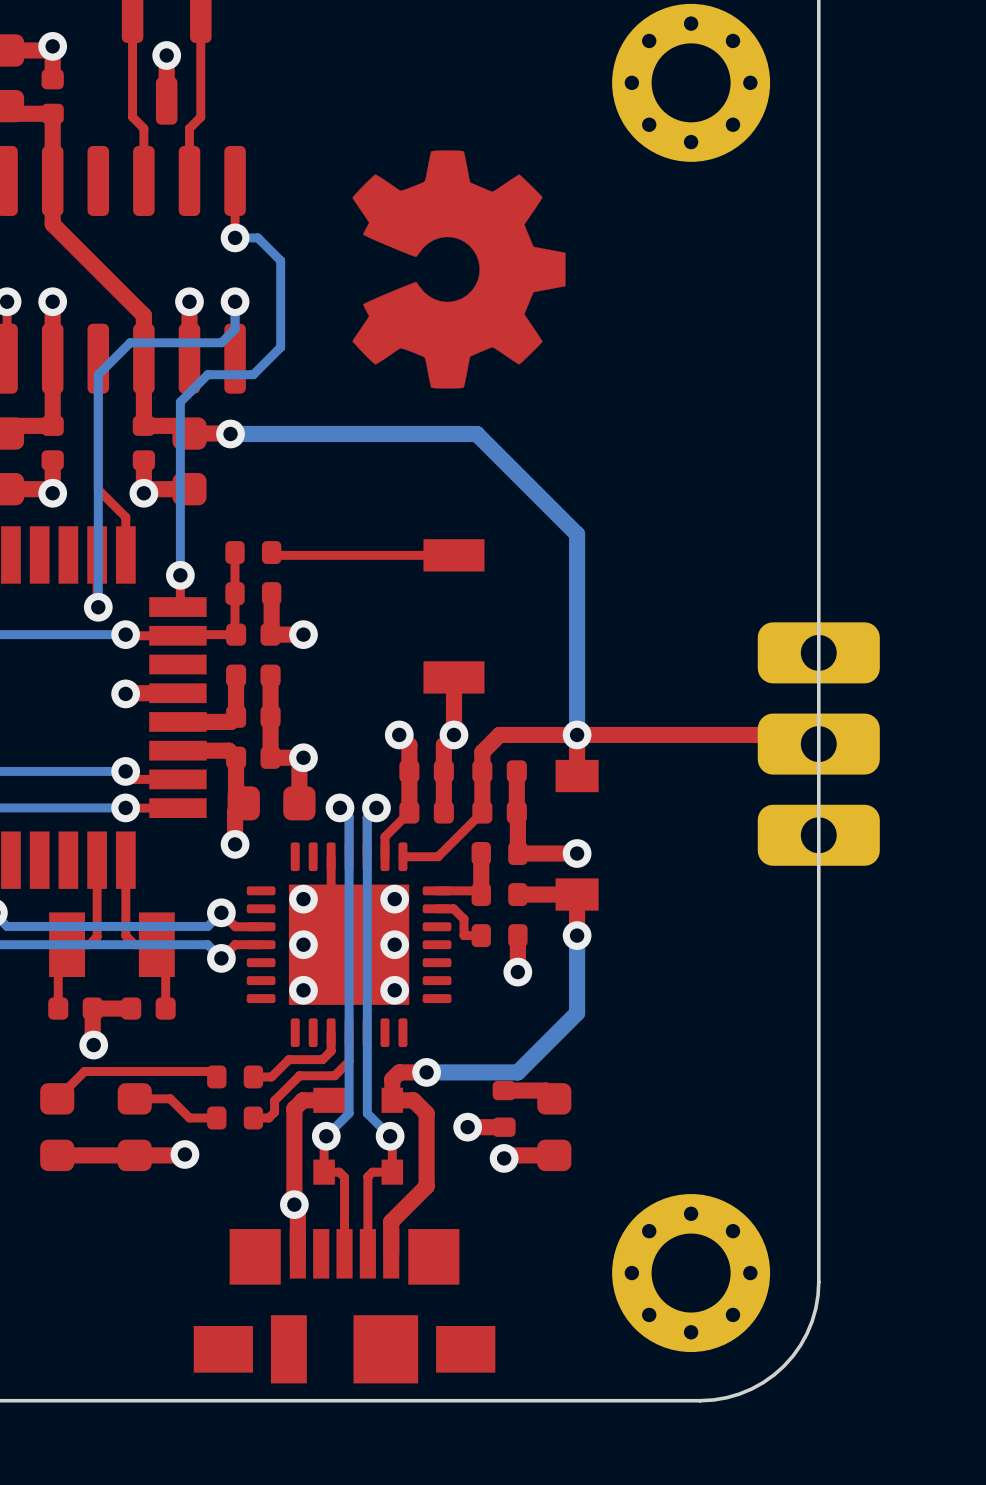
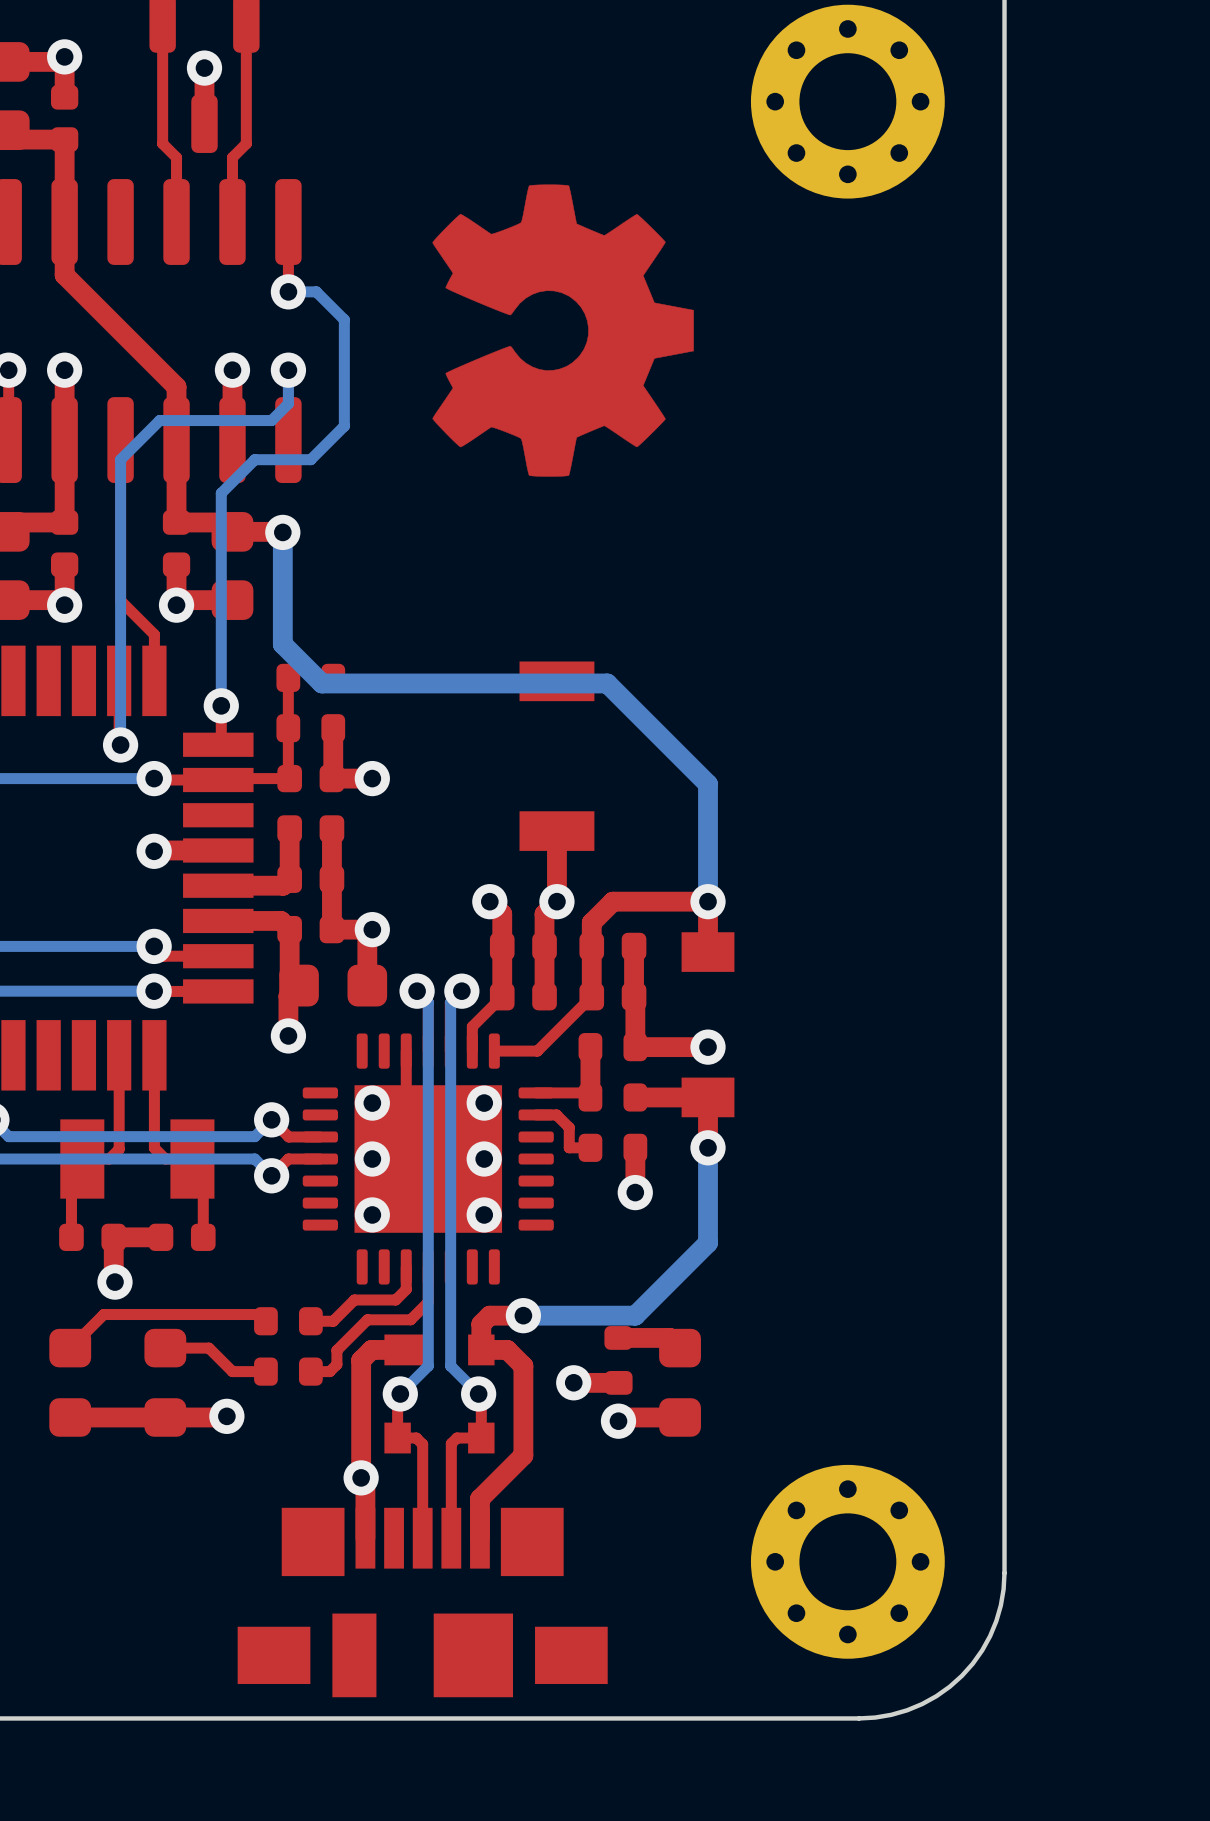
bottom track: (230, 433) (476, 433) (577, 534) (577, 639) -> (282, 532) (282, 644) (321, 683) (607, 683) (708, 784)
top track: (577, 734) (809, 734) (818, 744) -> none
part: (818, 744) -> none

